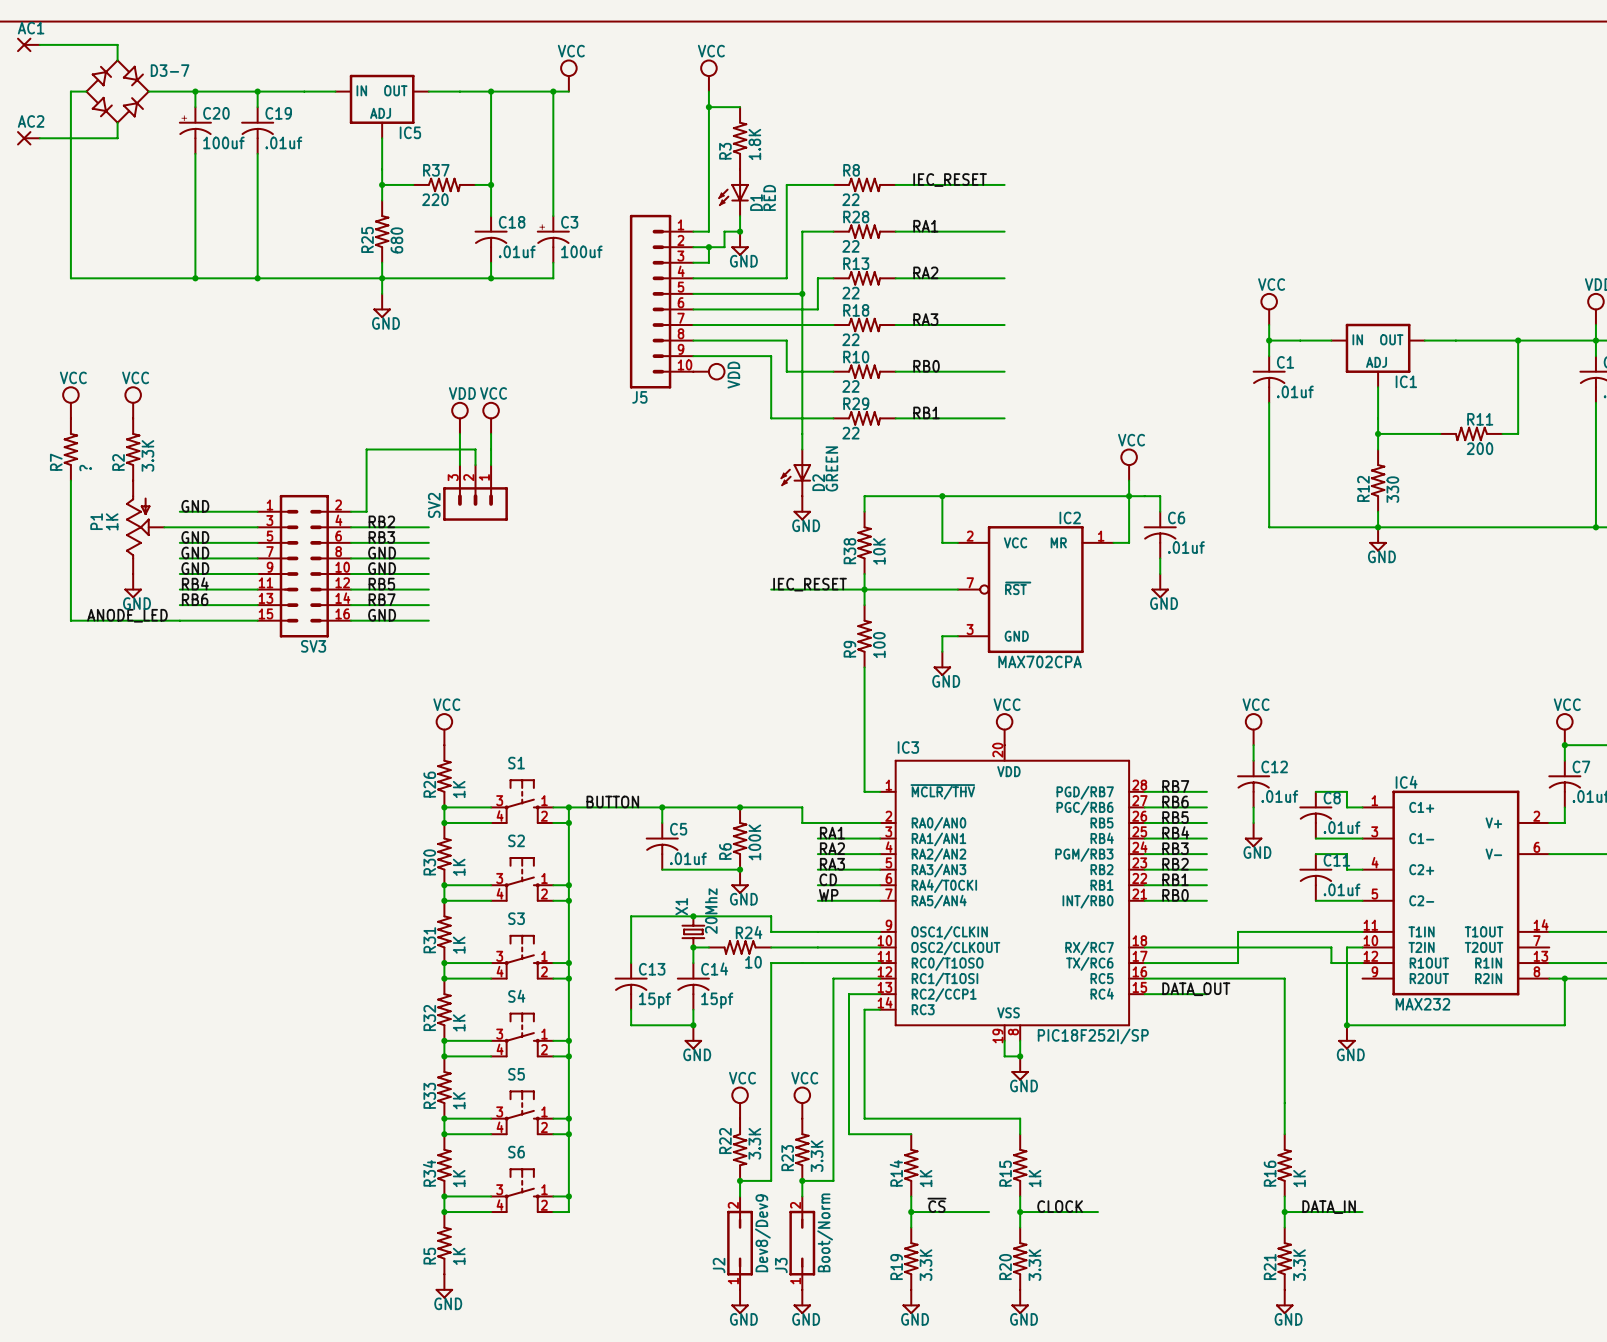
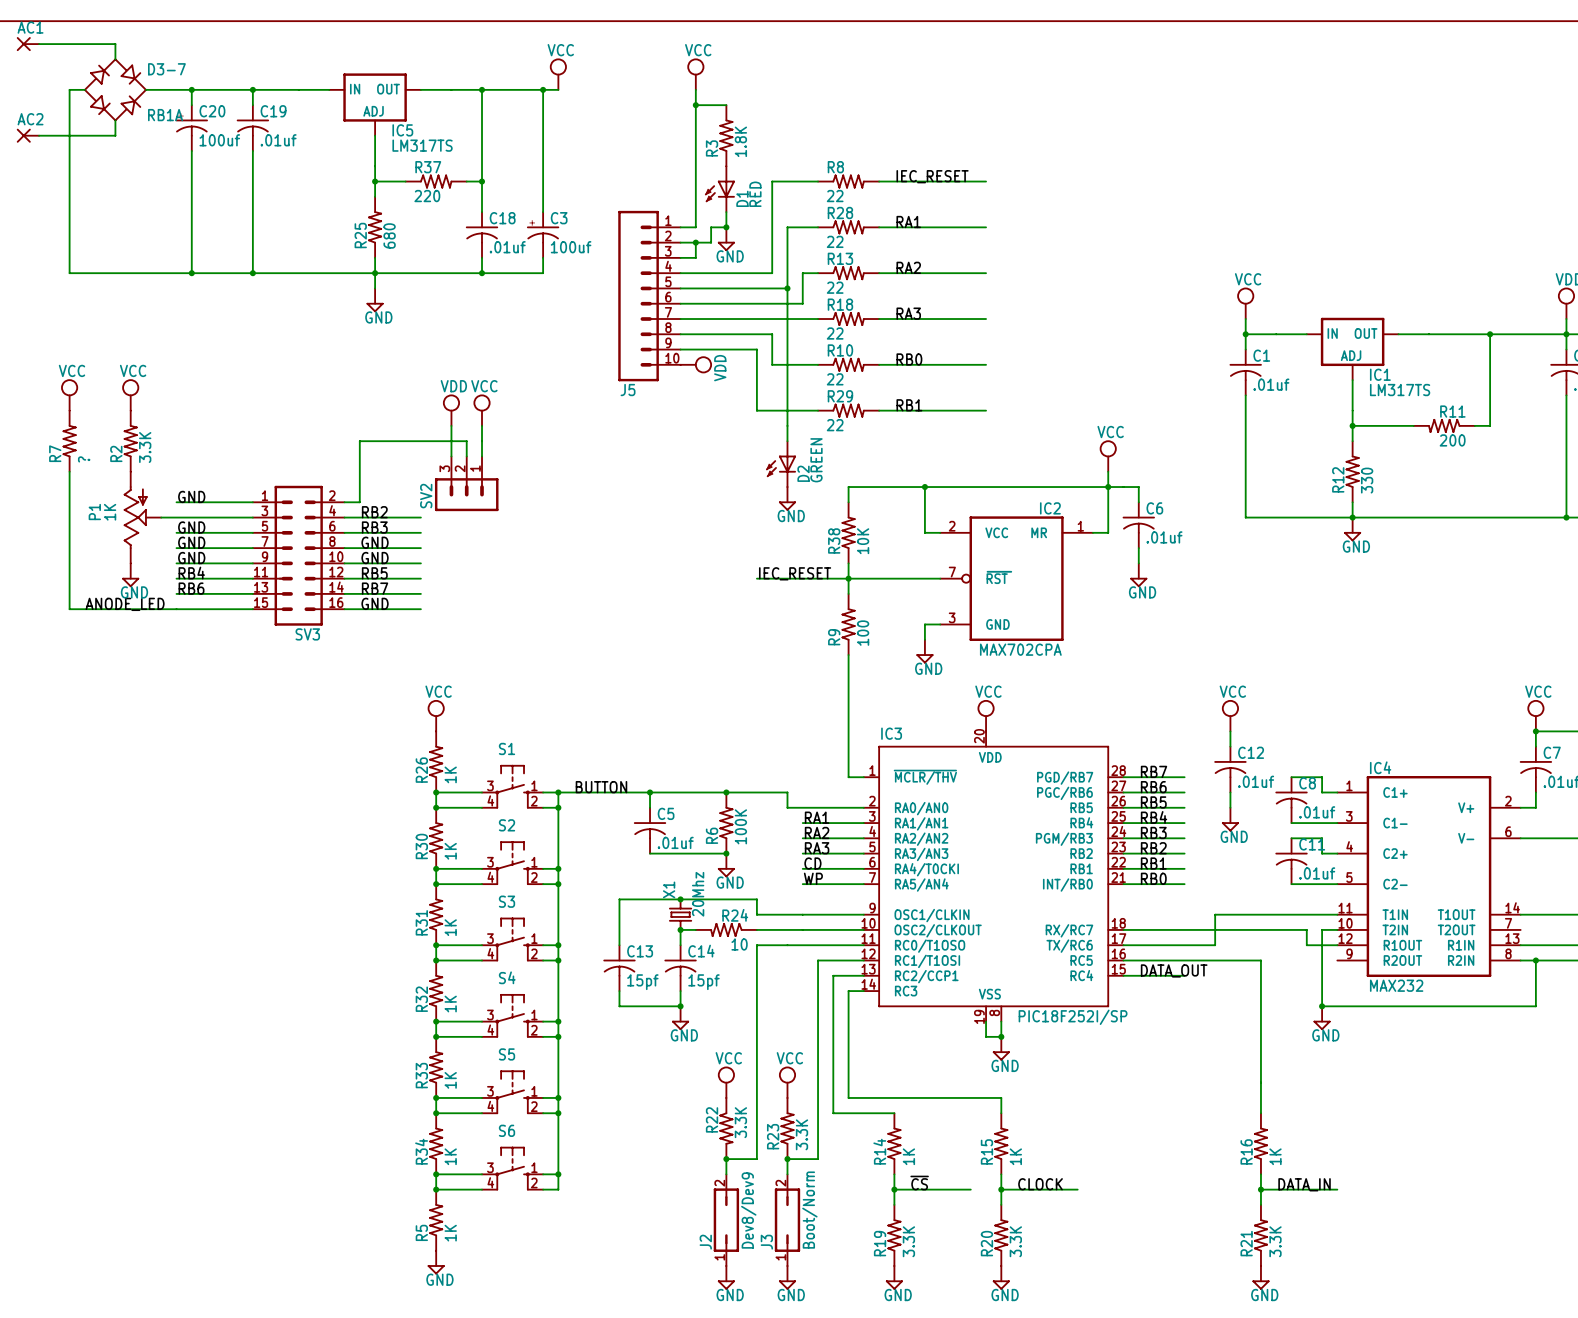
D3-7 value: none -> RB1A (165, 115)
IC5 value: none -> LM317TS (422, 145)
IC1 value: none -> LM317TS (1400, 390)

